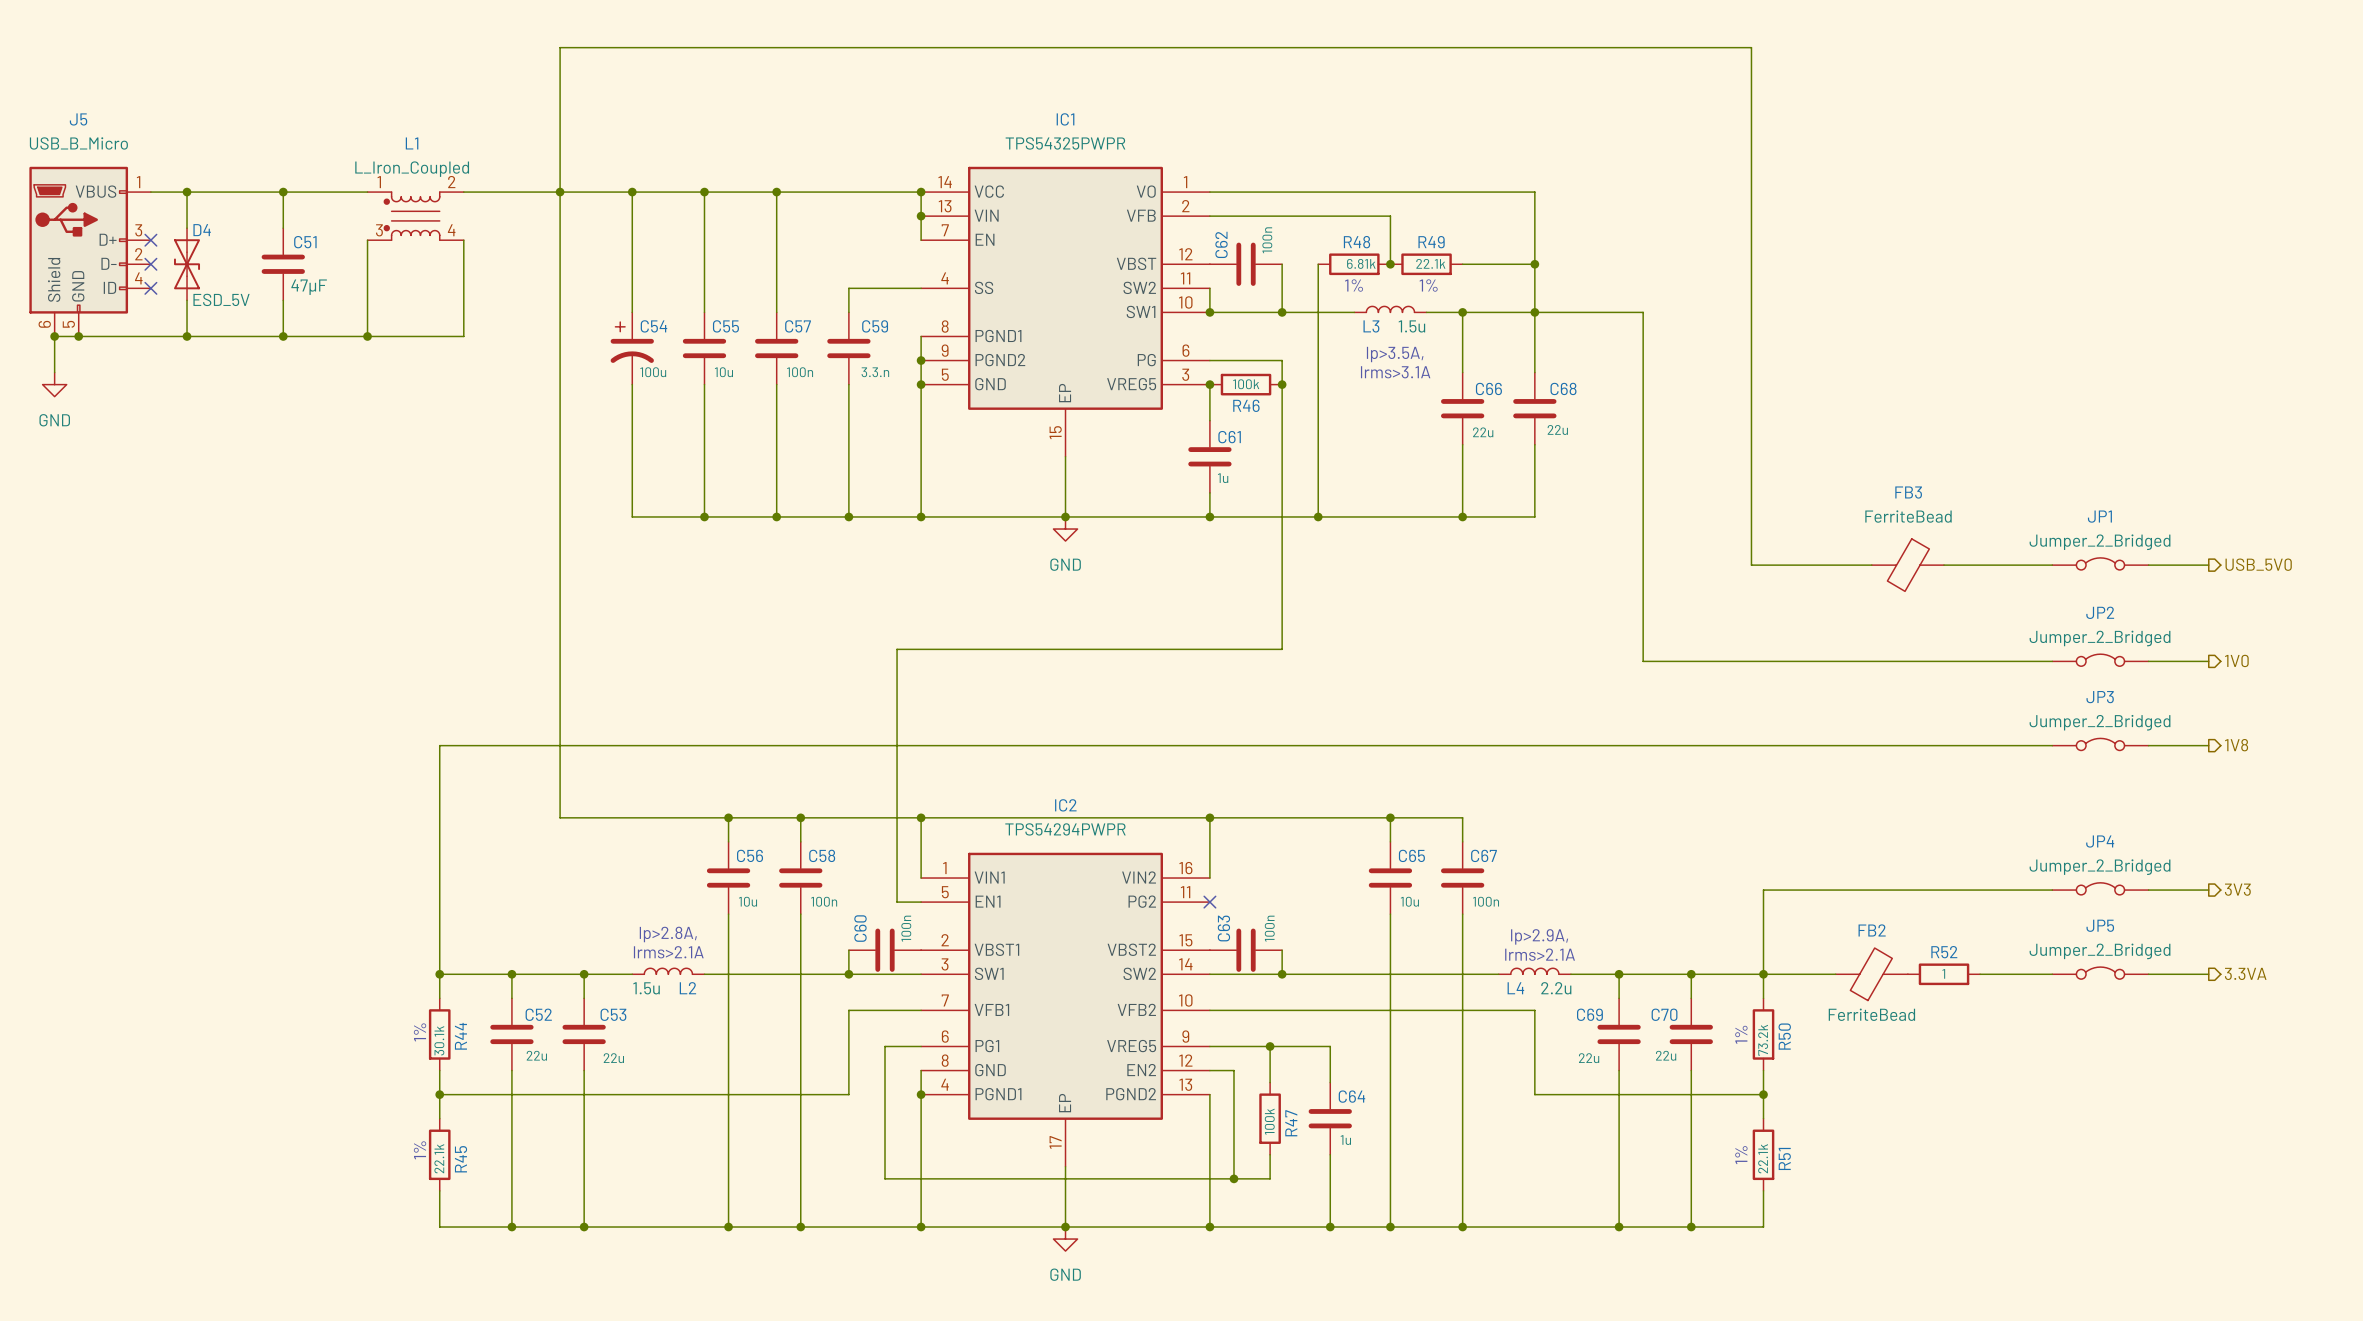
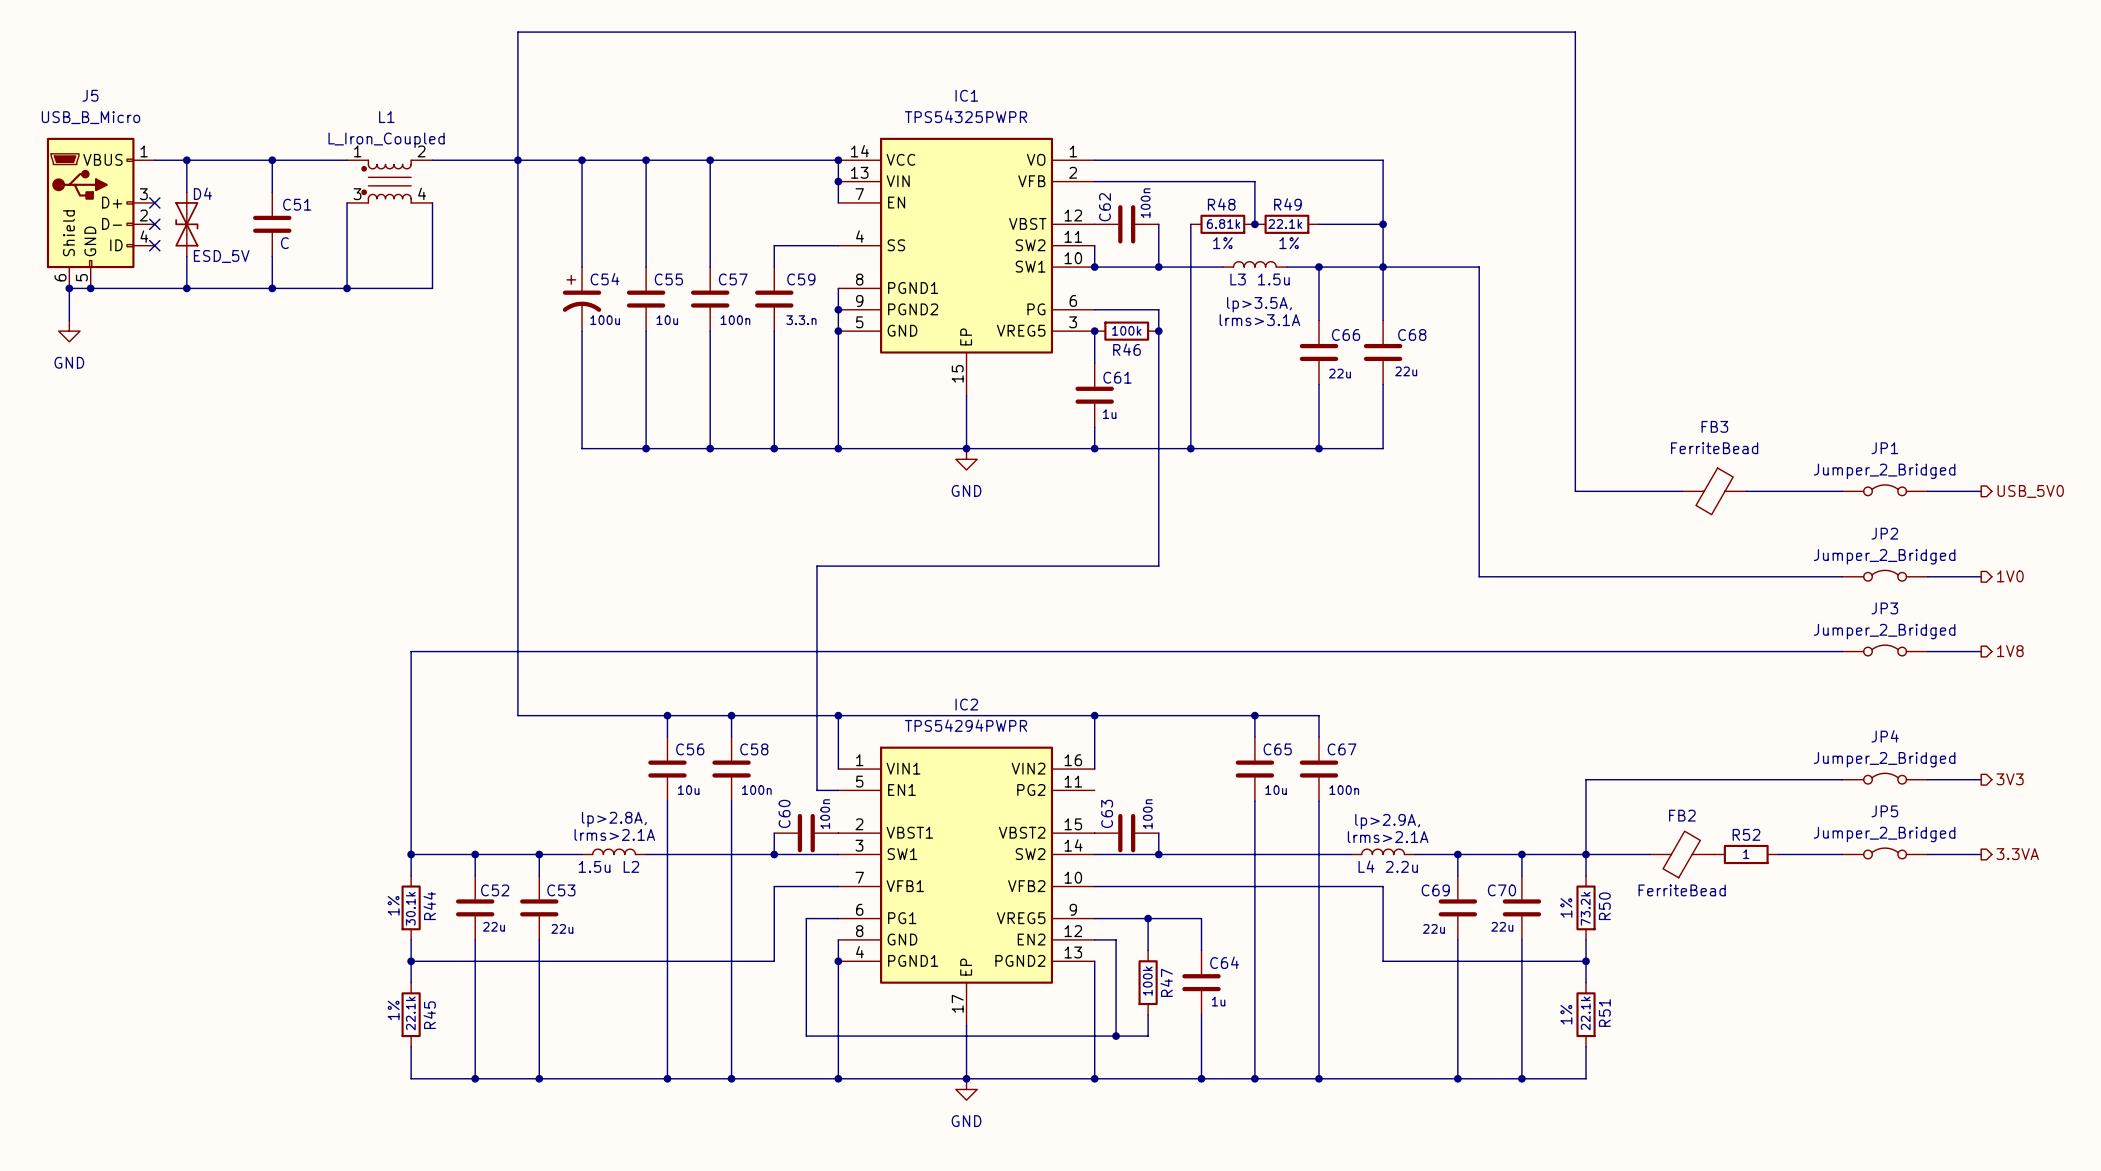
C51 value: 47μF (309, 287) -> C (284, 243)
no-connect mark: (1209, 902) -> none

